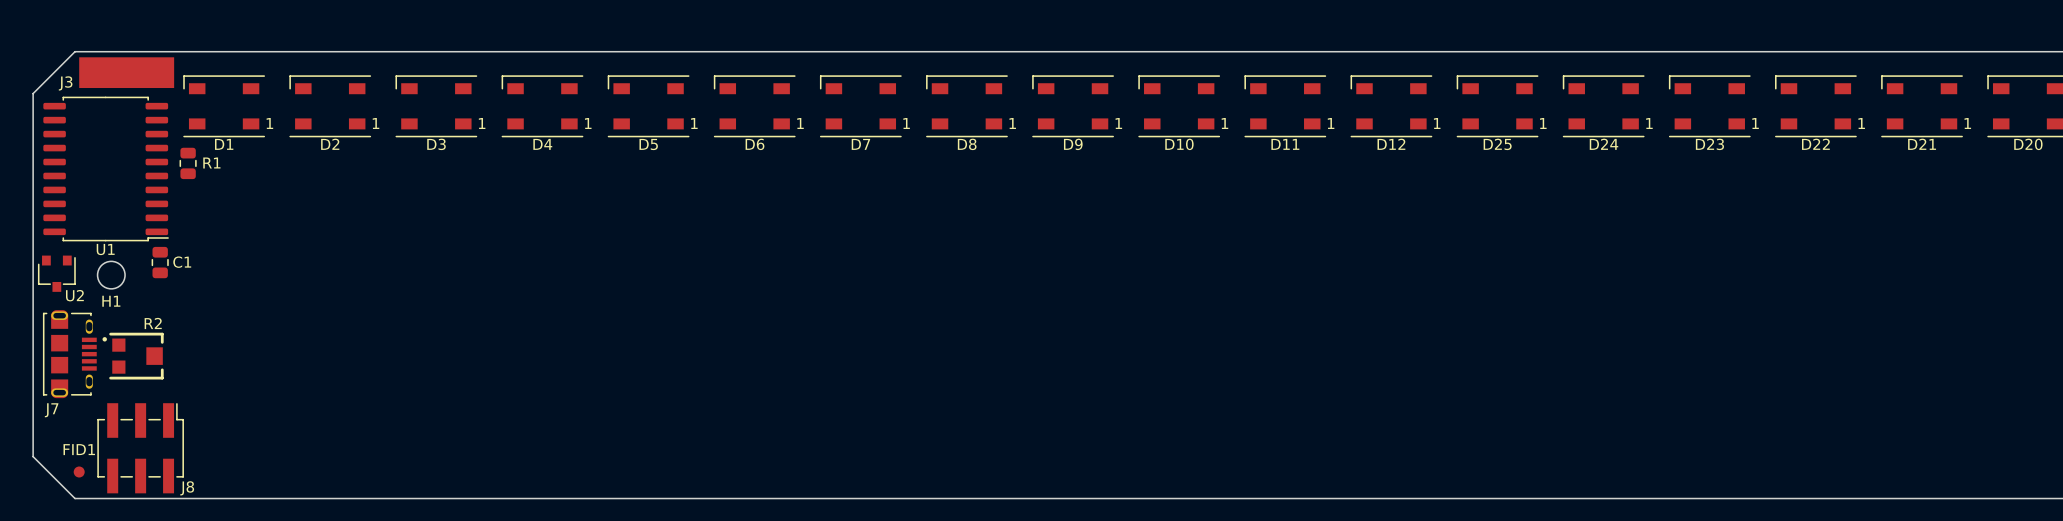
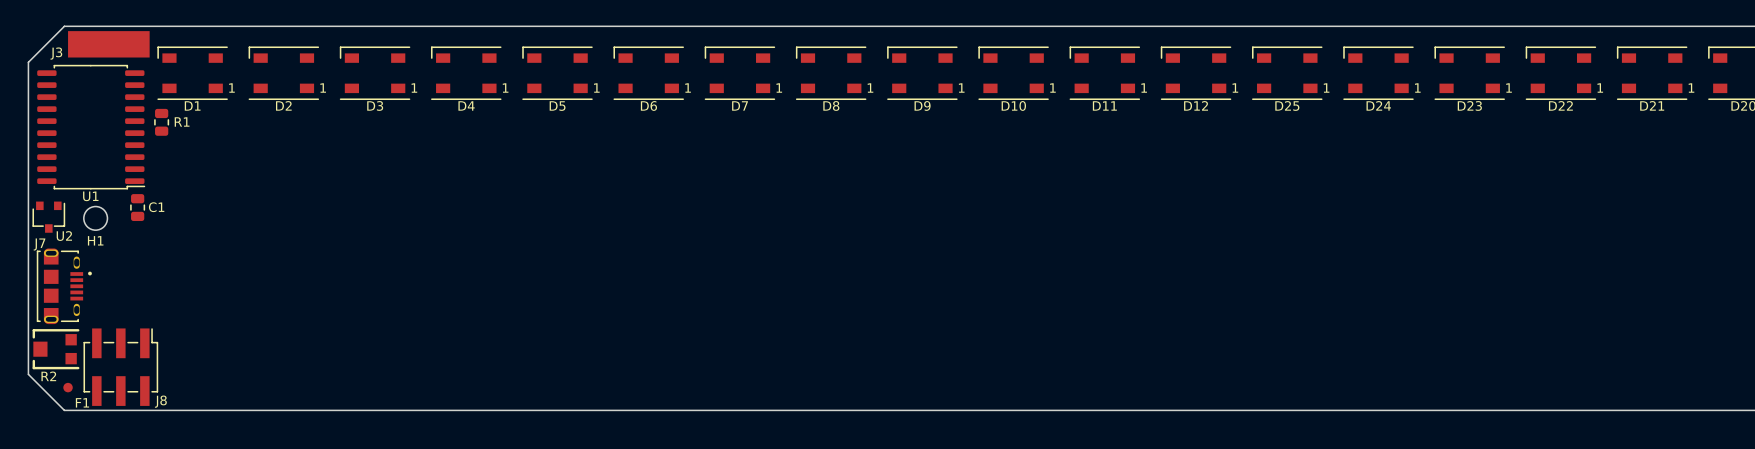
R2 rotation: 0° (136, 356) -> 180° (56, 349)
R2 position: (136, 356) -> (56, 349)
J7 name position: J7 (51, 410) -> J7 (39, 244)
FID1 name: FID1 (79, 449) -> F1 (82, 402)

